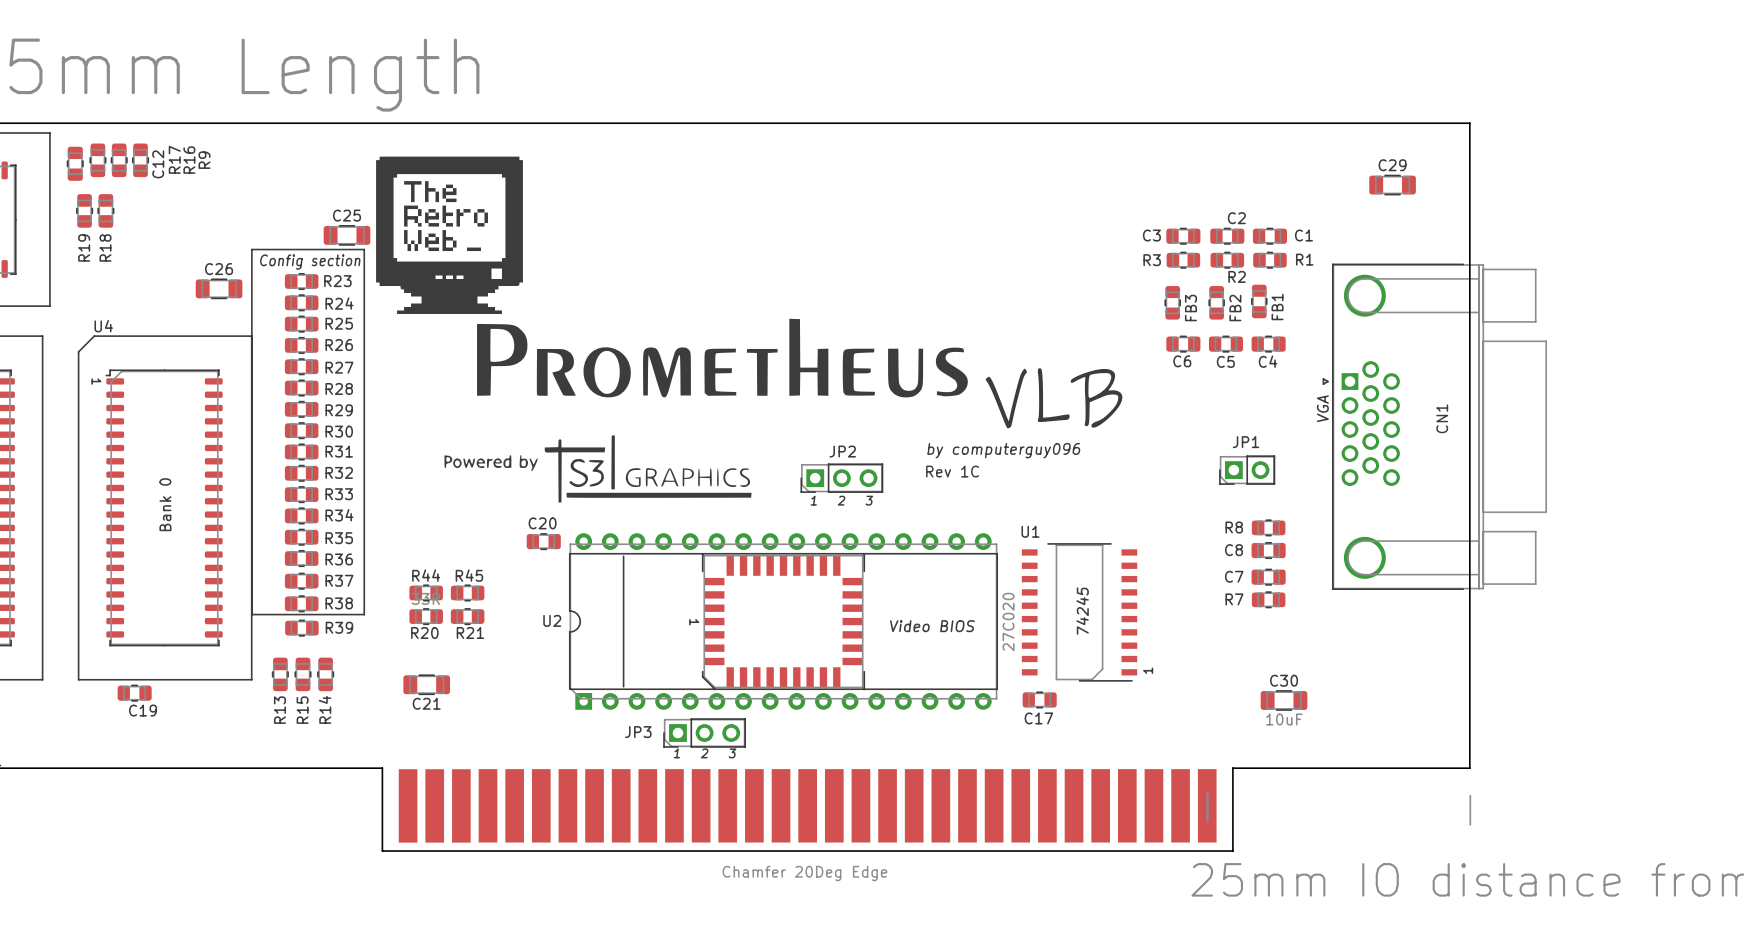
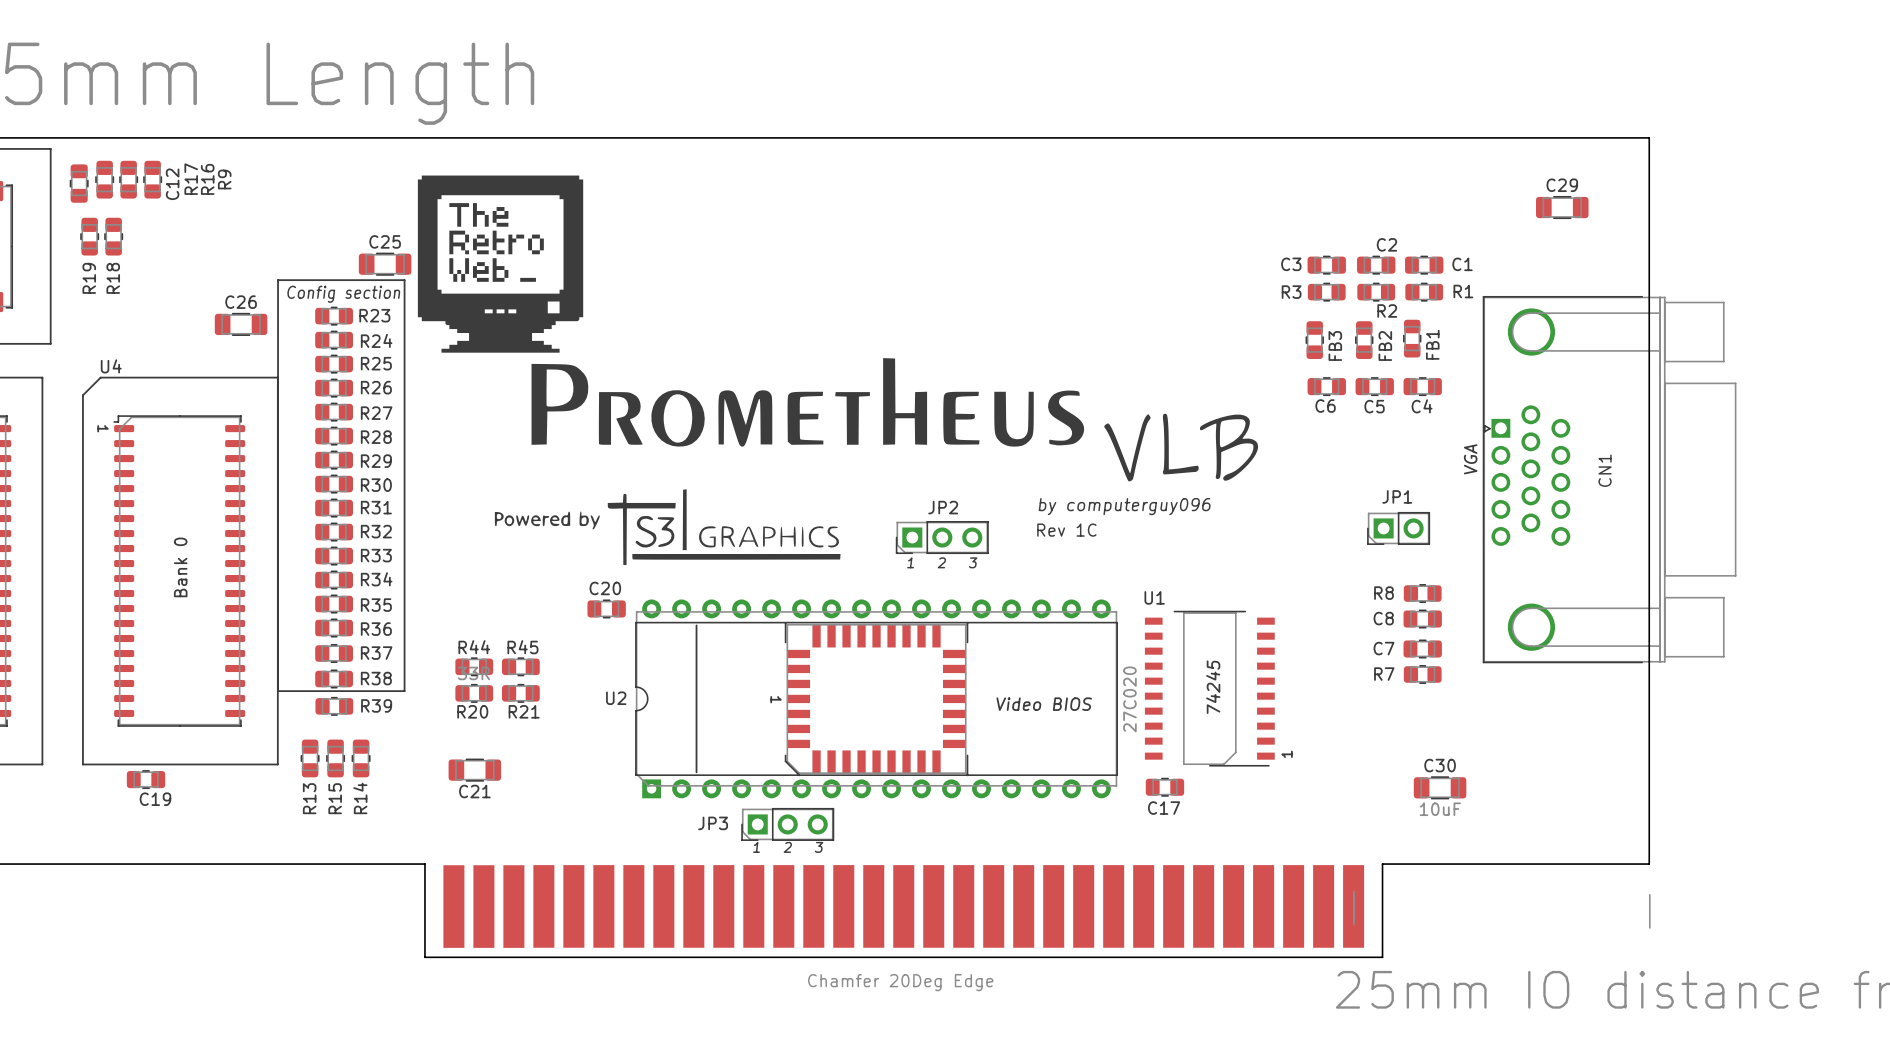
CN1 footprint: [1322, 263, 1547, 590] -> [1482, 296, 1737, 664]

